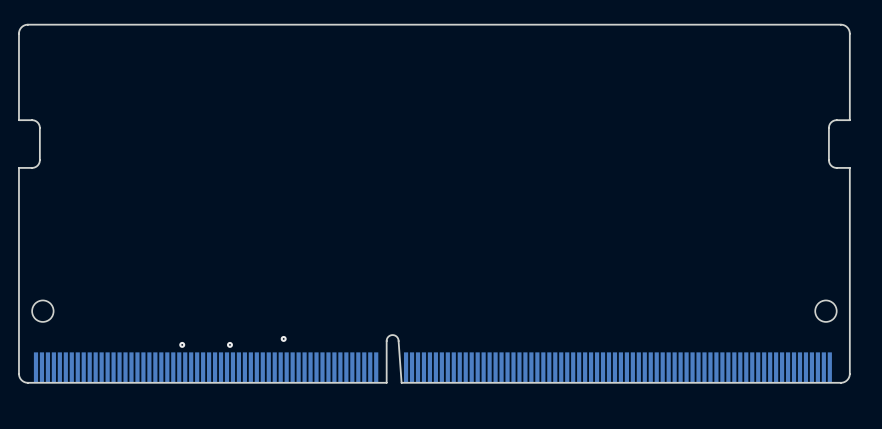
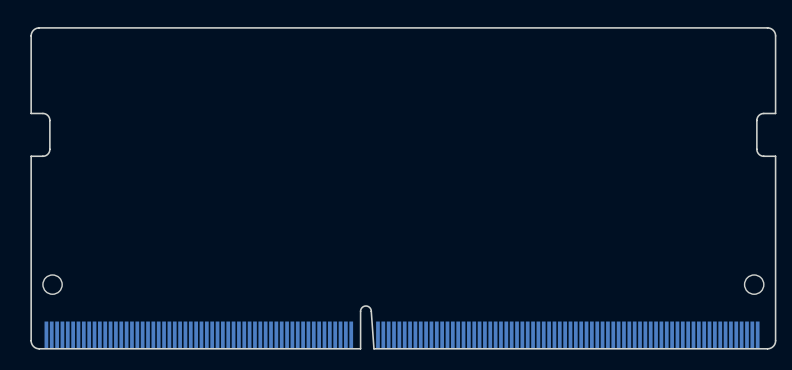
via: (283, 338) -> none
via: (182, 344) -> none
via: (229, 344) -> none

